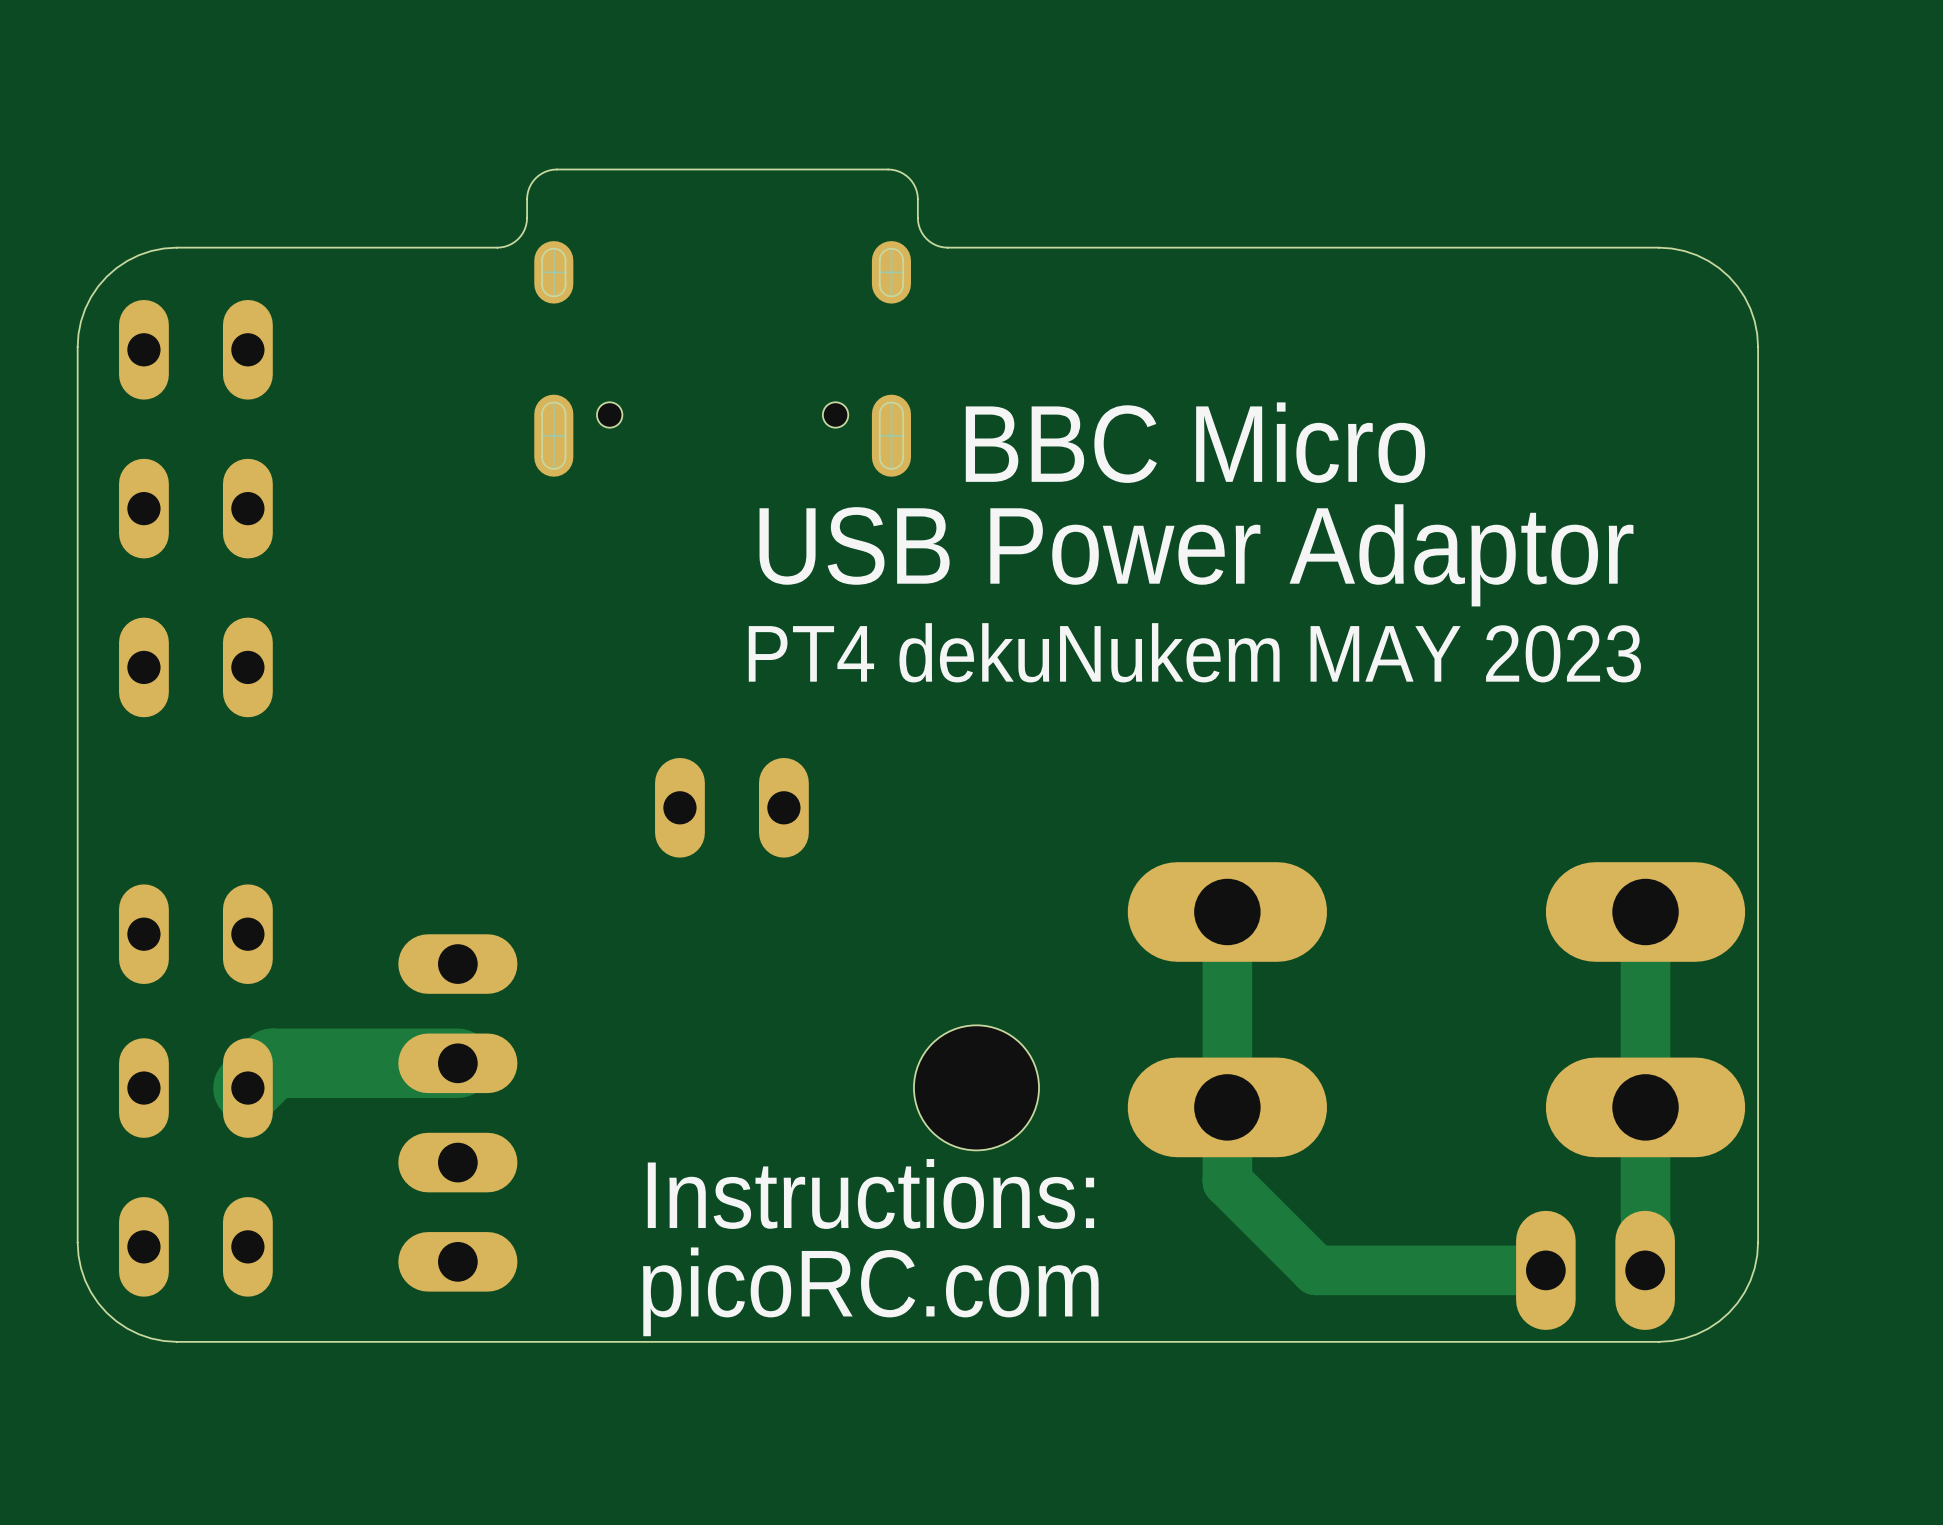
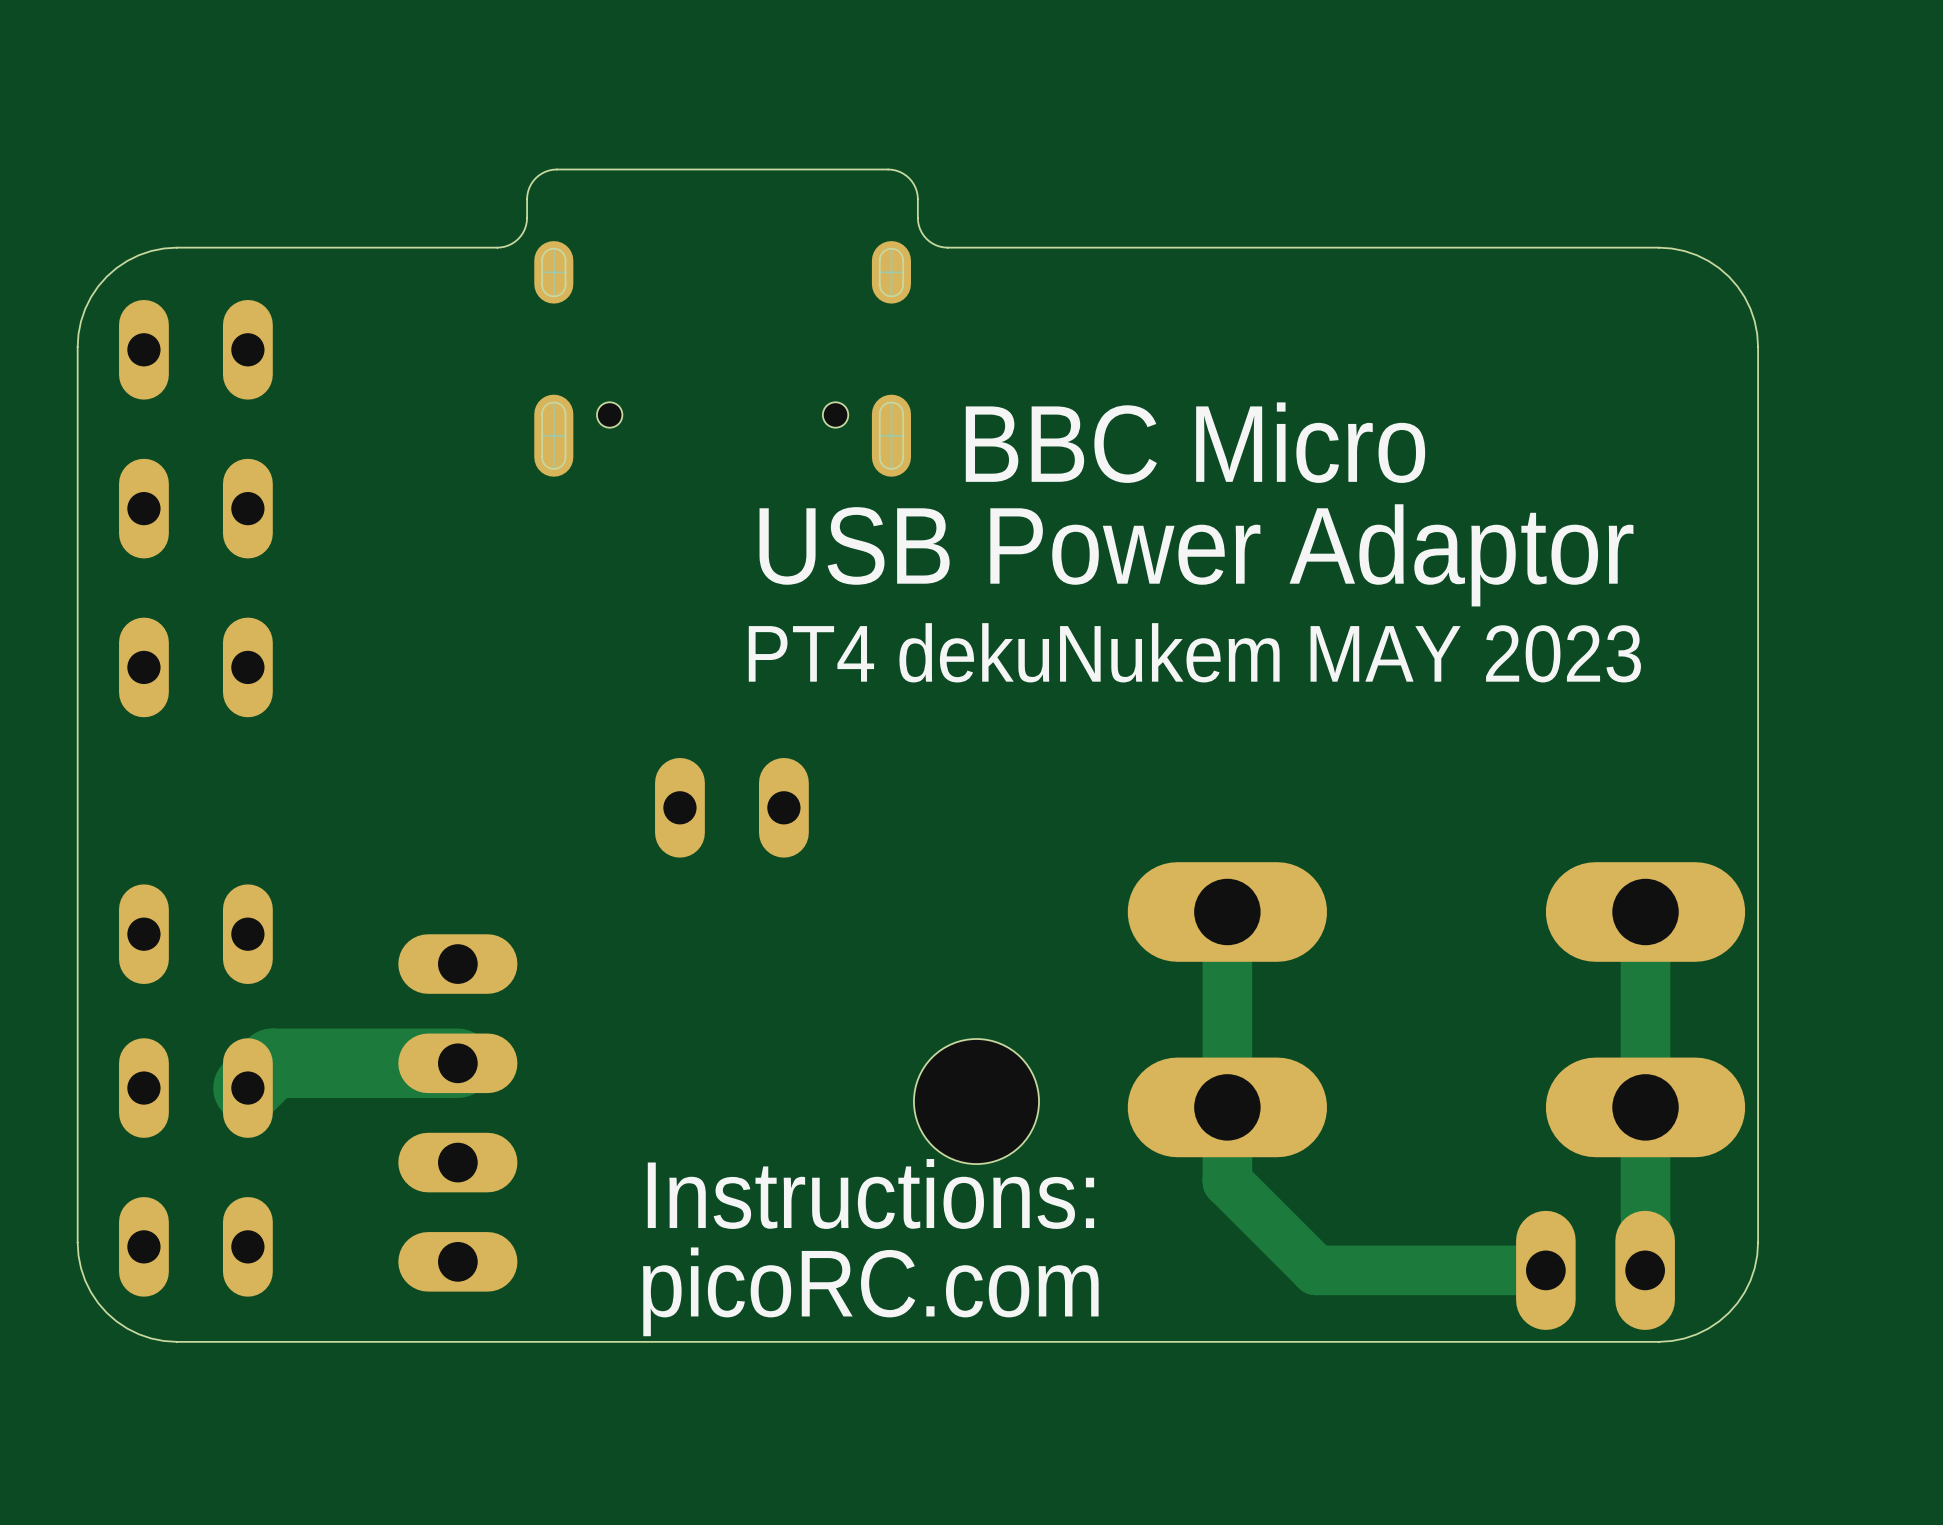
part position: (976, 1087) -> (976, 1101)

